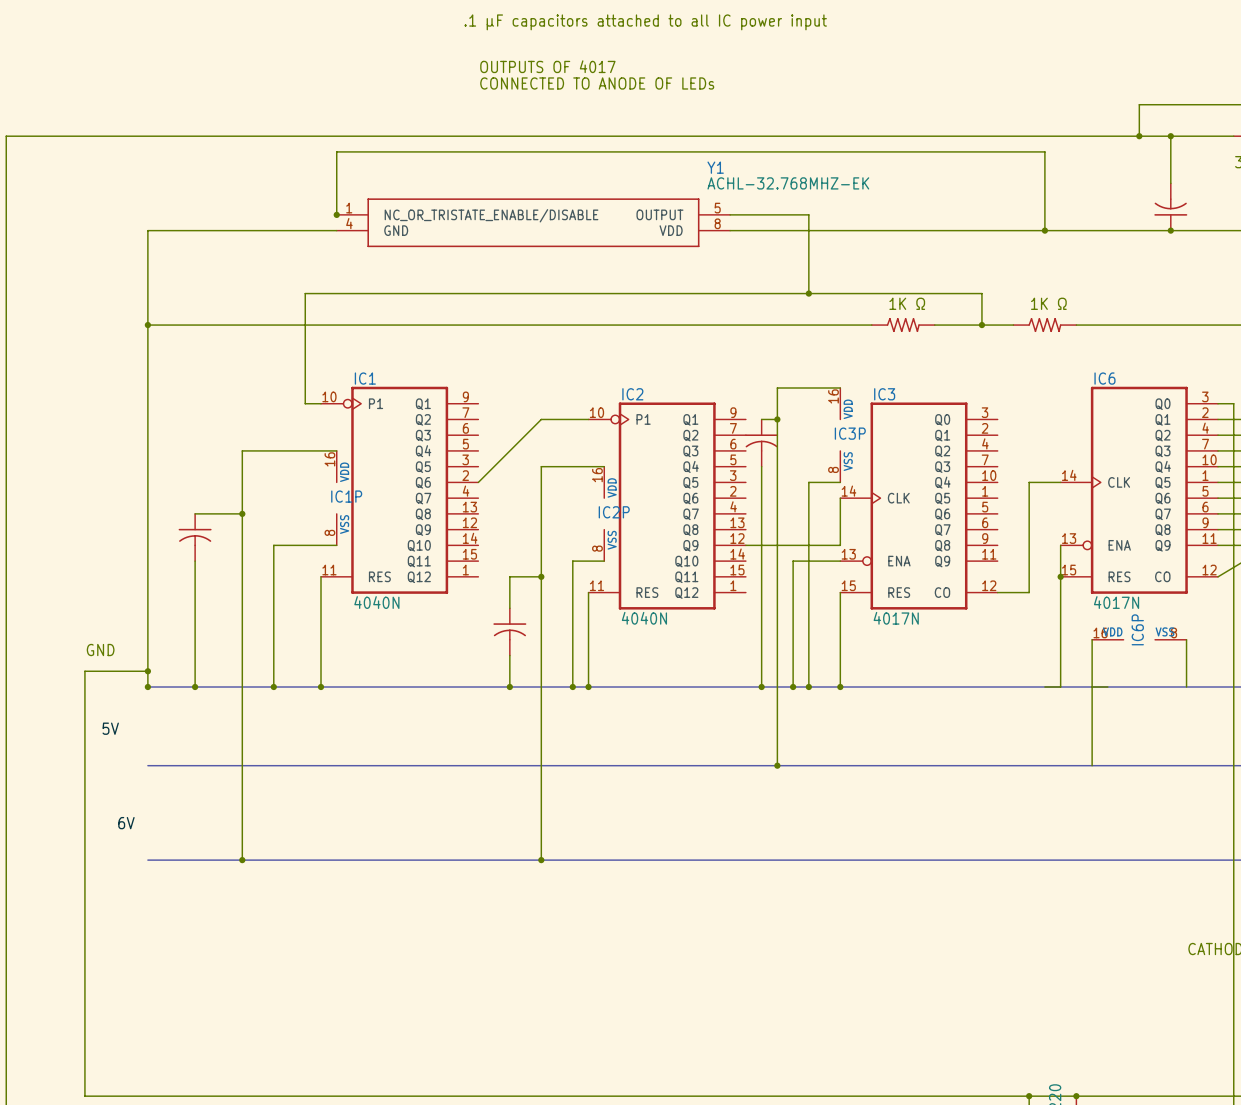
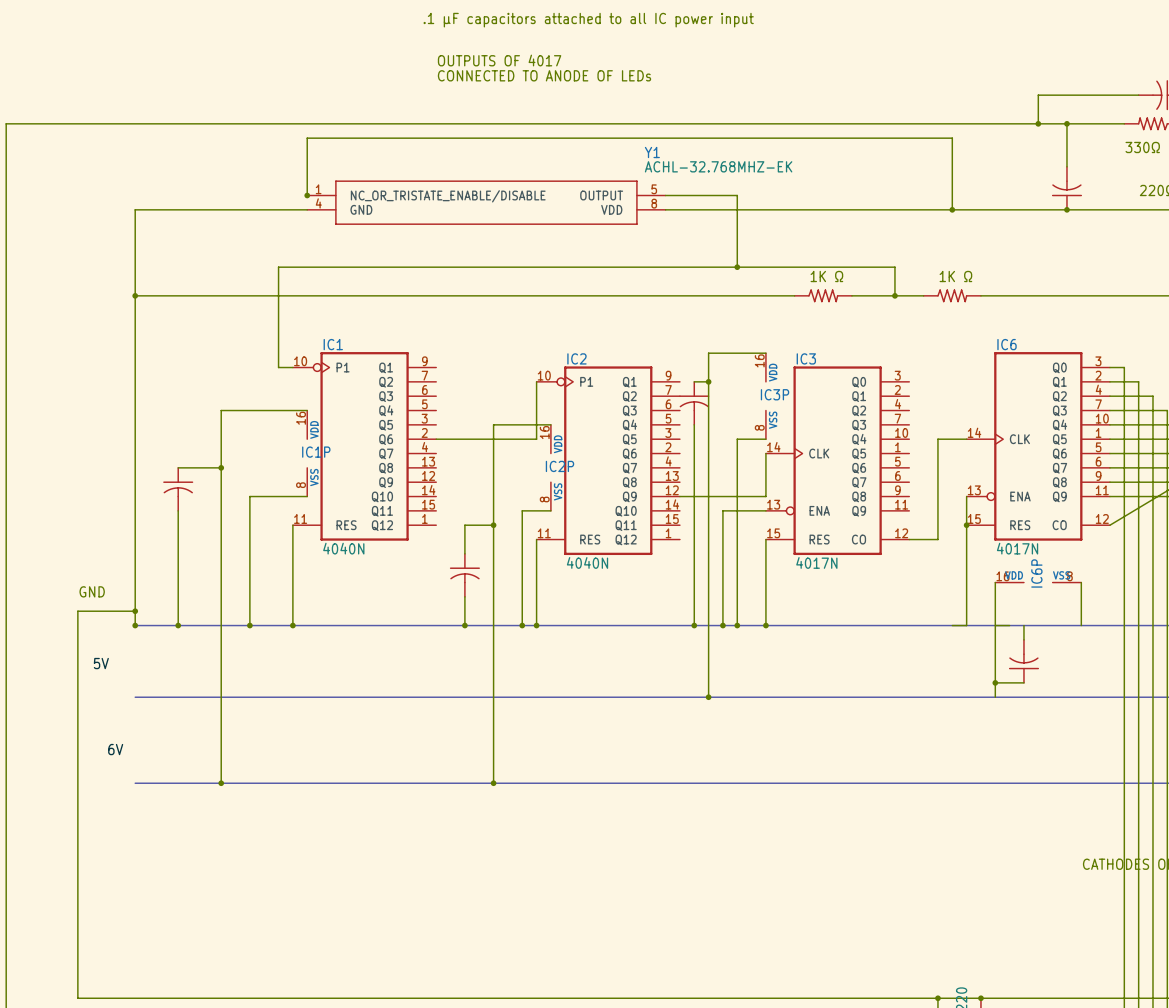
wire: (588, 419) (541, 419) (478, 482) -> (536, 381) (536, 439) (436, 439)
wire: none -> (1023, 625) (1023, 639)
part: none -> (1023, 661)
wire: none -> (995, 682) (1023, 682)
junction: none -> (995, 682)

